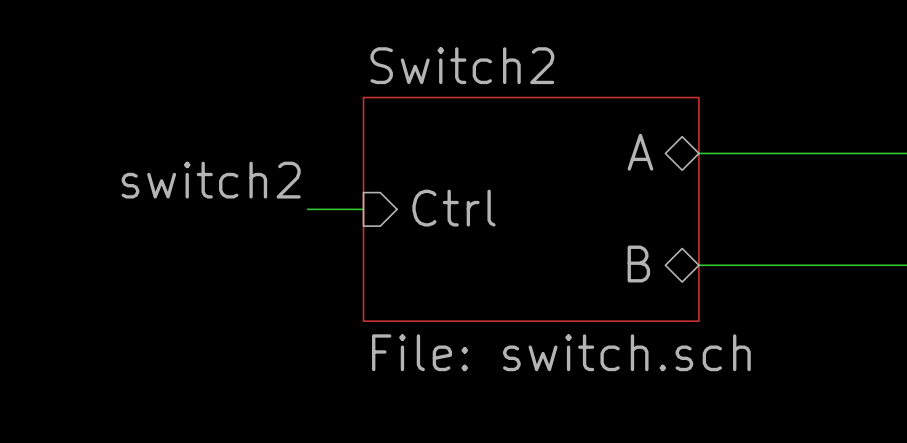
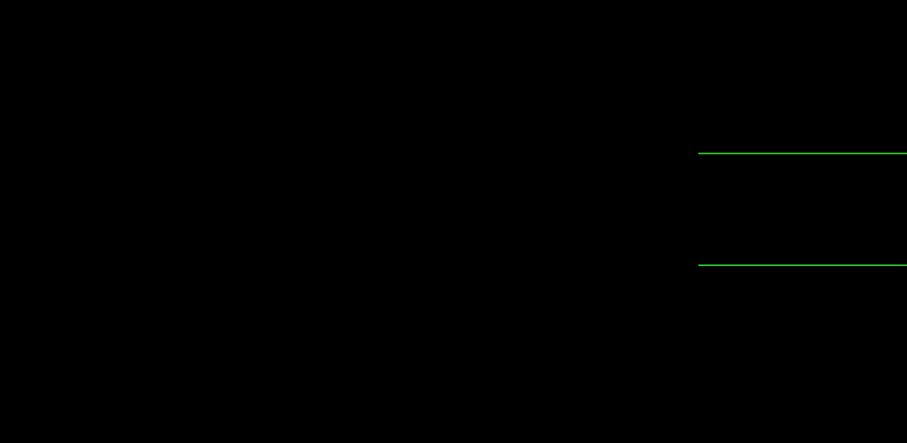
sheet pin: A (640, 152) -> none
label: switch2 (211, 180) -> none
sheet pin: Ctrl (453, 208) -> none
wire: (307, 209) (363, 209) -> none
sheet Switch2: File: switch.sch (531, 209) -> none
sheet pin: B (638, 264) -> none

